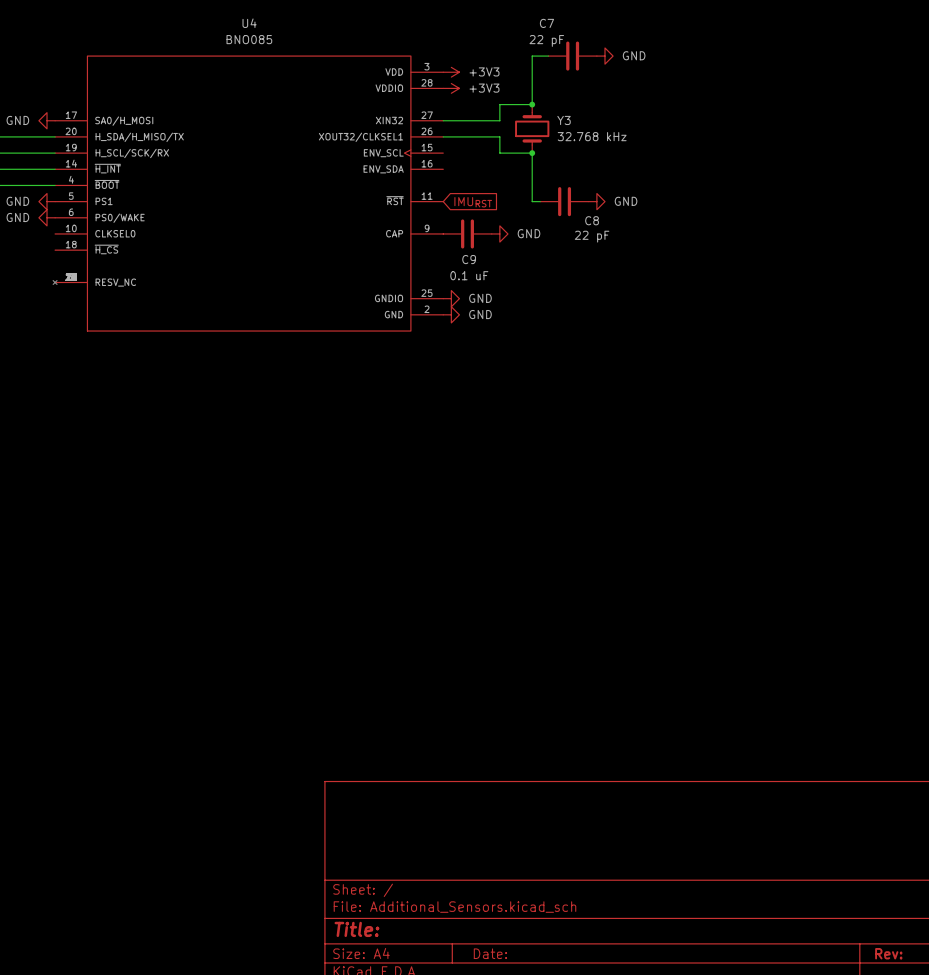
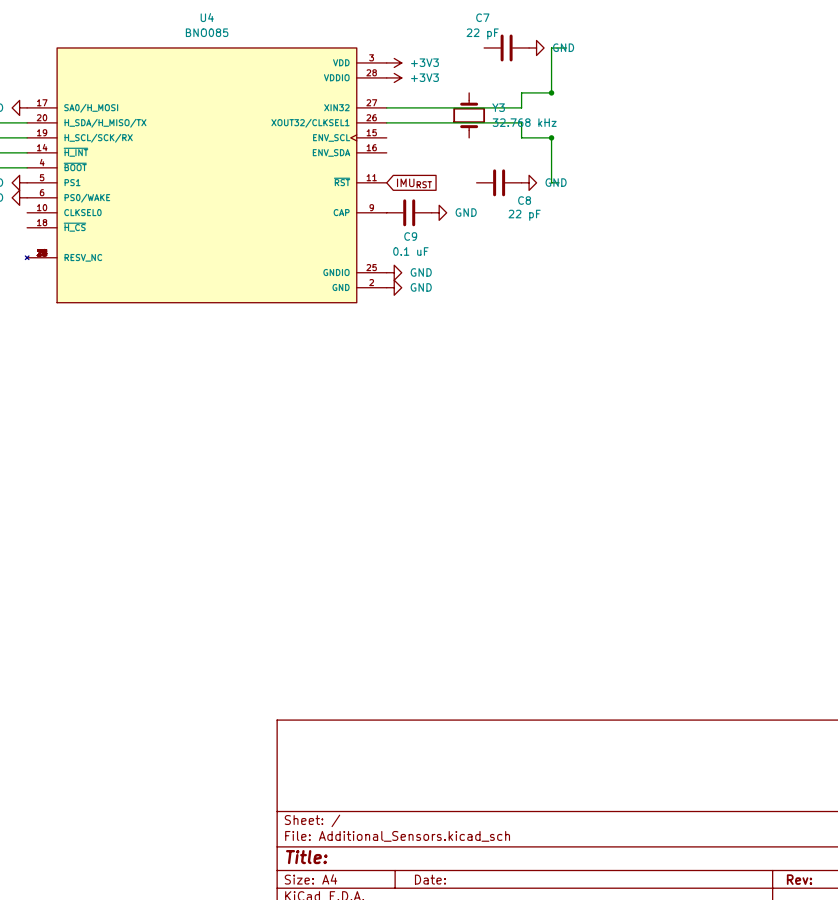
wire: (548, 56) (532, 56) (532, 104) (499, 104) (499, 120) -> (566, 47) (551, 47) (551, 92) (521, 92) (521, 107) (439, 107)
junction: (532, 104) -> none
junction: none -> (551, 92)
wire: (499, 136) (499, 153) (532, 153) (532, 201) (540, 201) -> (439, 122) (521, 122) (521, 137) (551, 137) (551, 182) (559, 182)
junction: (532, 153) -> none
junction: none -> (551, 137)

